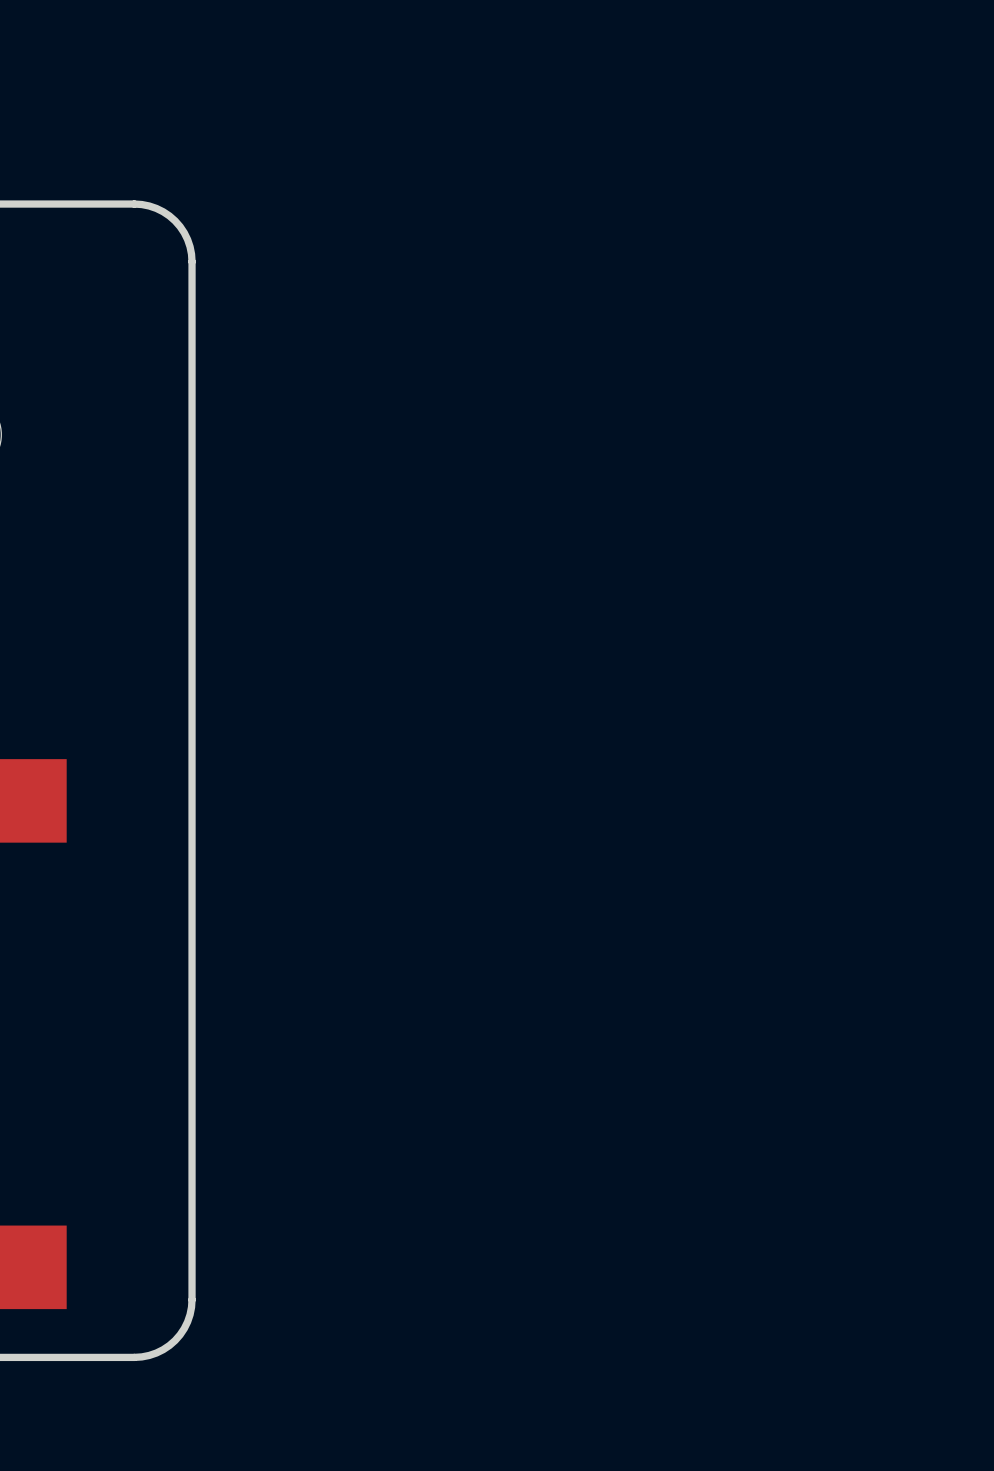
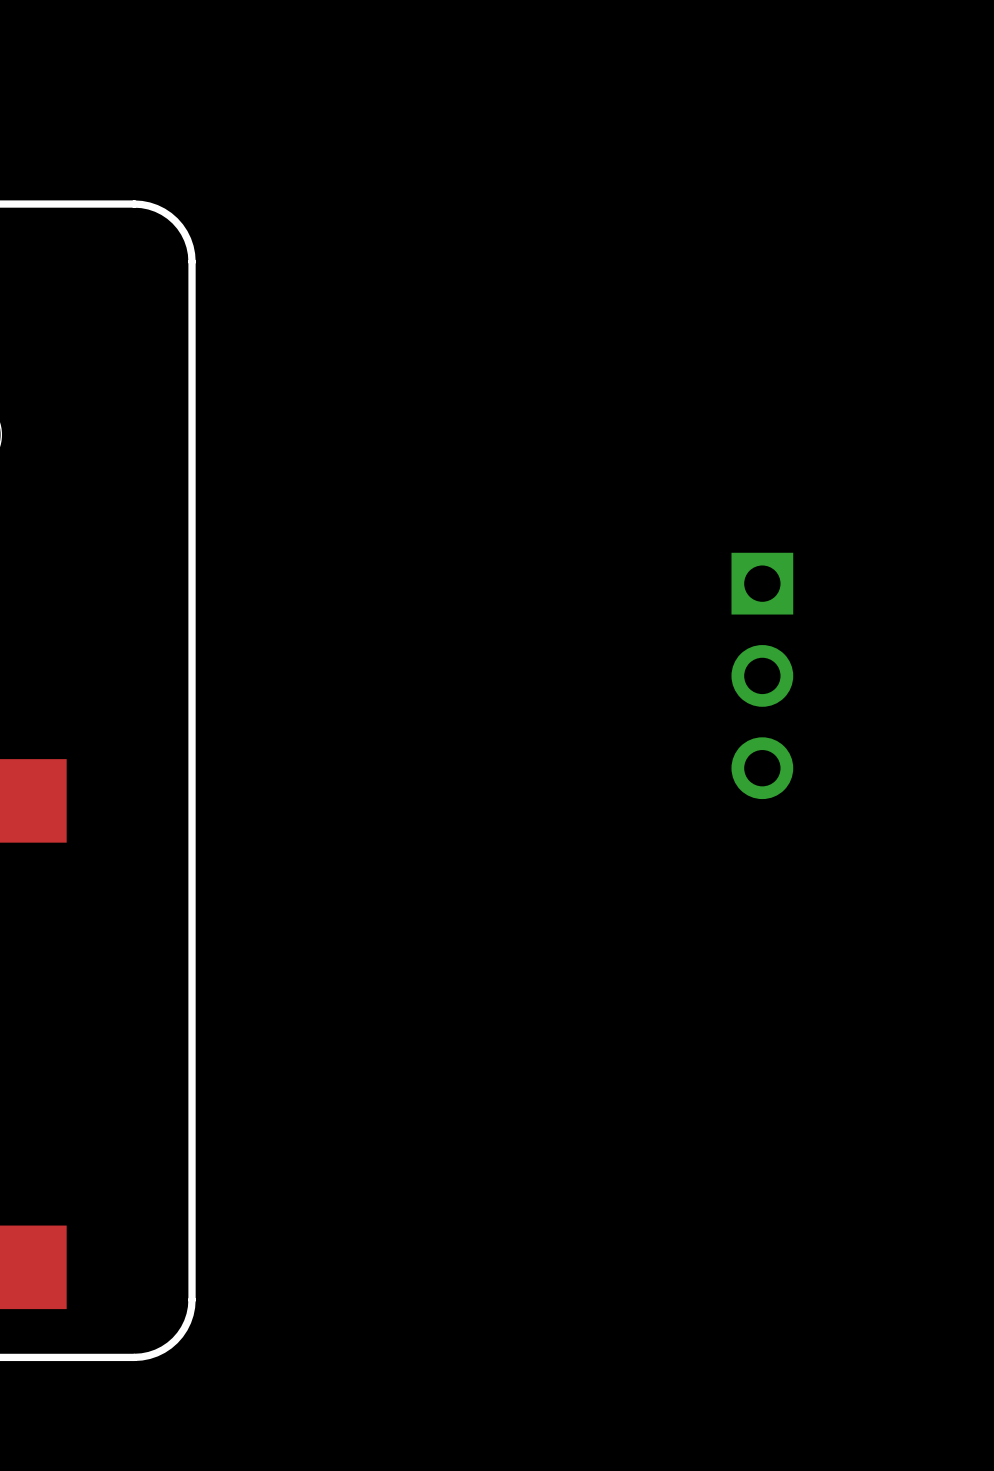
part: none -> (762, 675)

